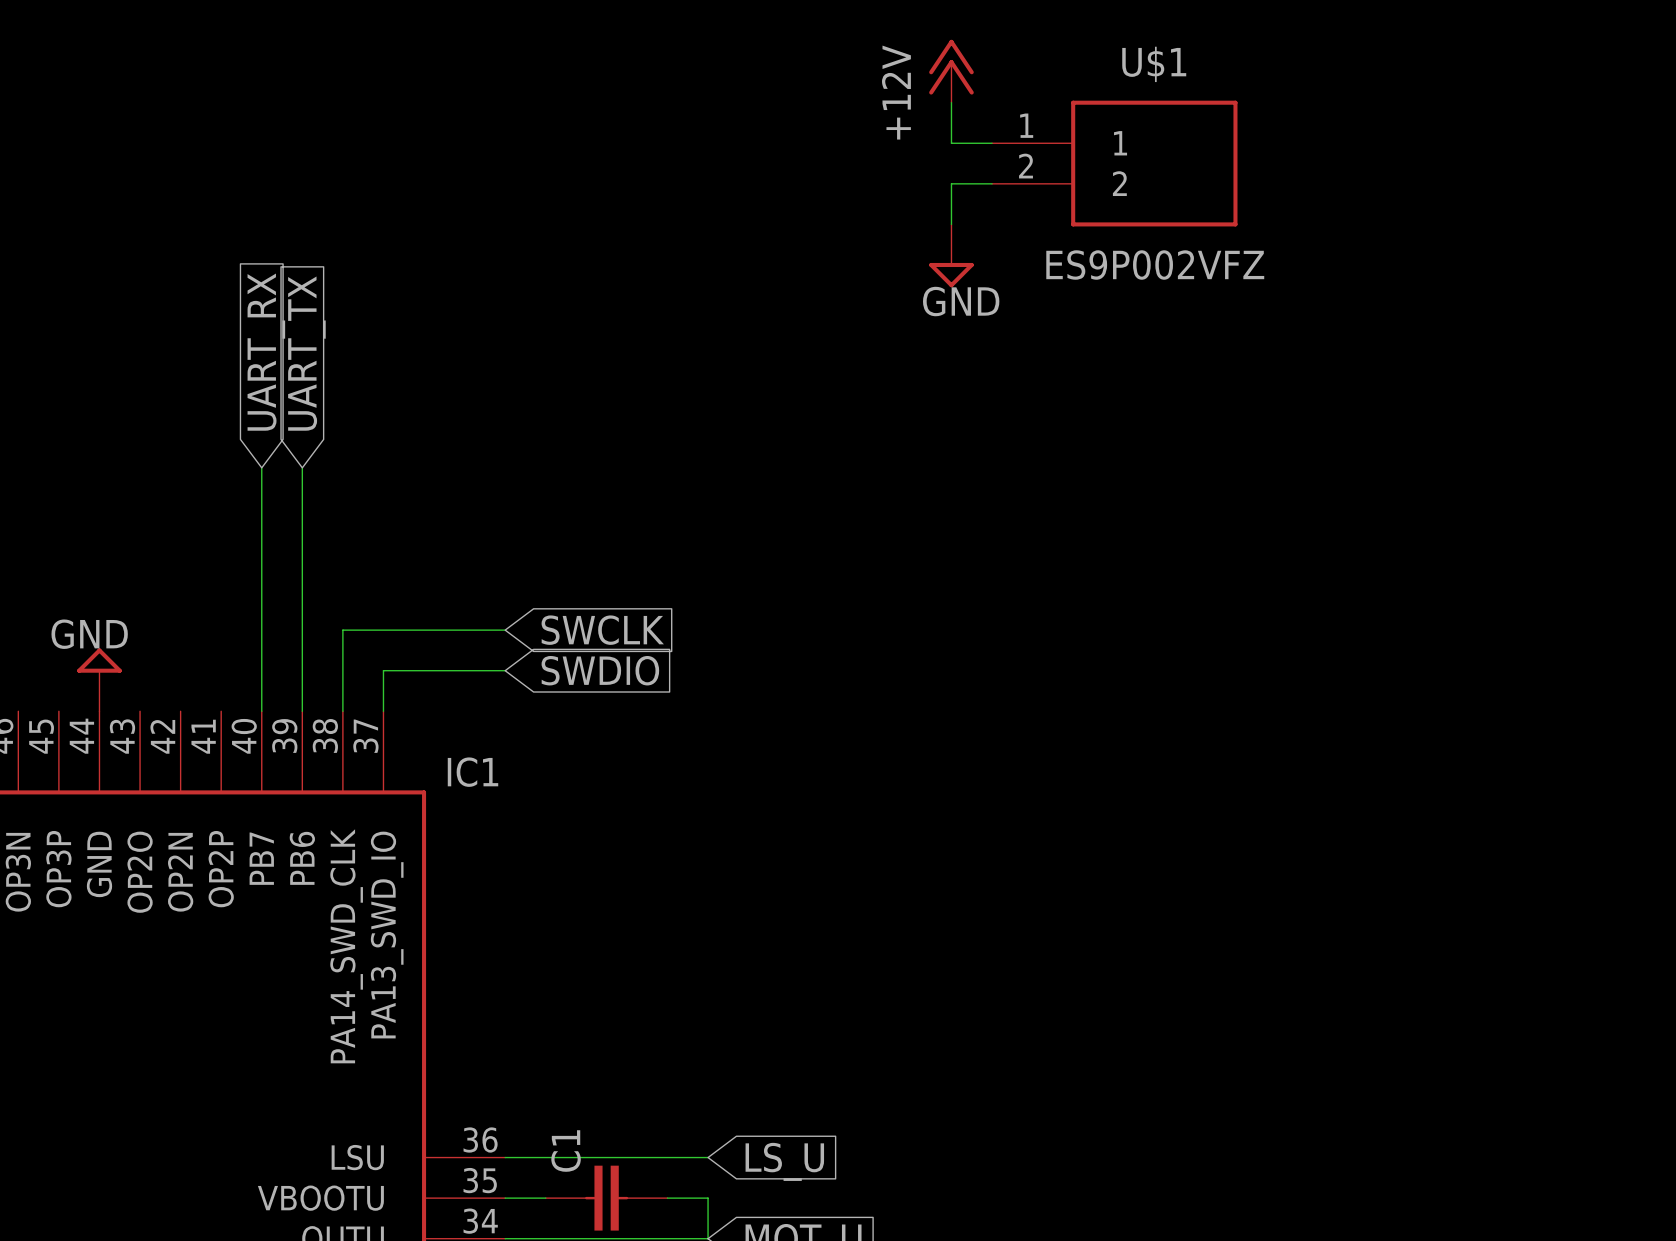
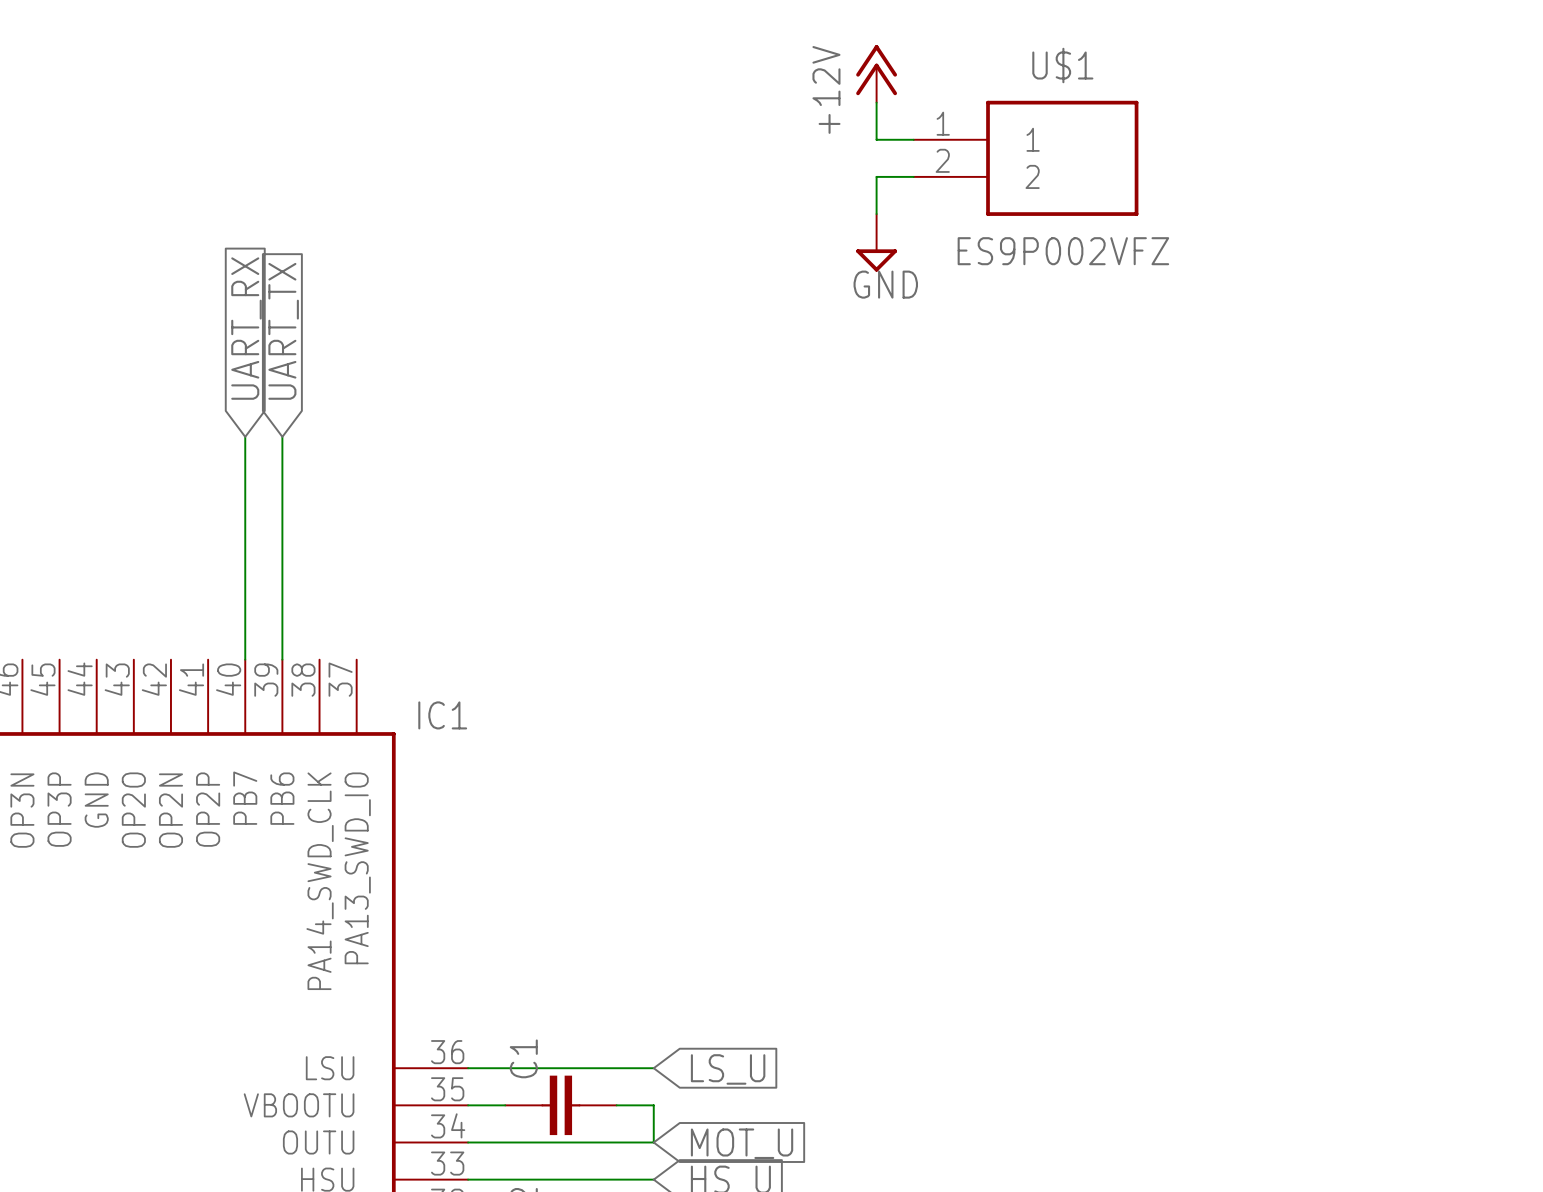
wire: (505, 630) (342, 630) (342, 711) -> none
global label: SWCLK (602, 630) -> none
wire: (505, 670) (383, 670) (383, 711) -> none
global label: SWDIO (600, 670) -> none
power symbol: GND (99, 679) -> none

